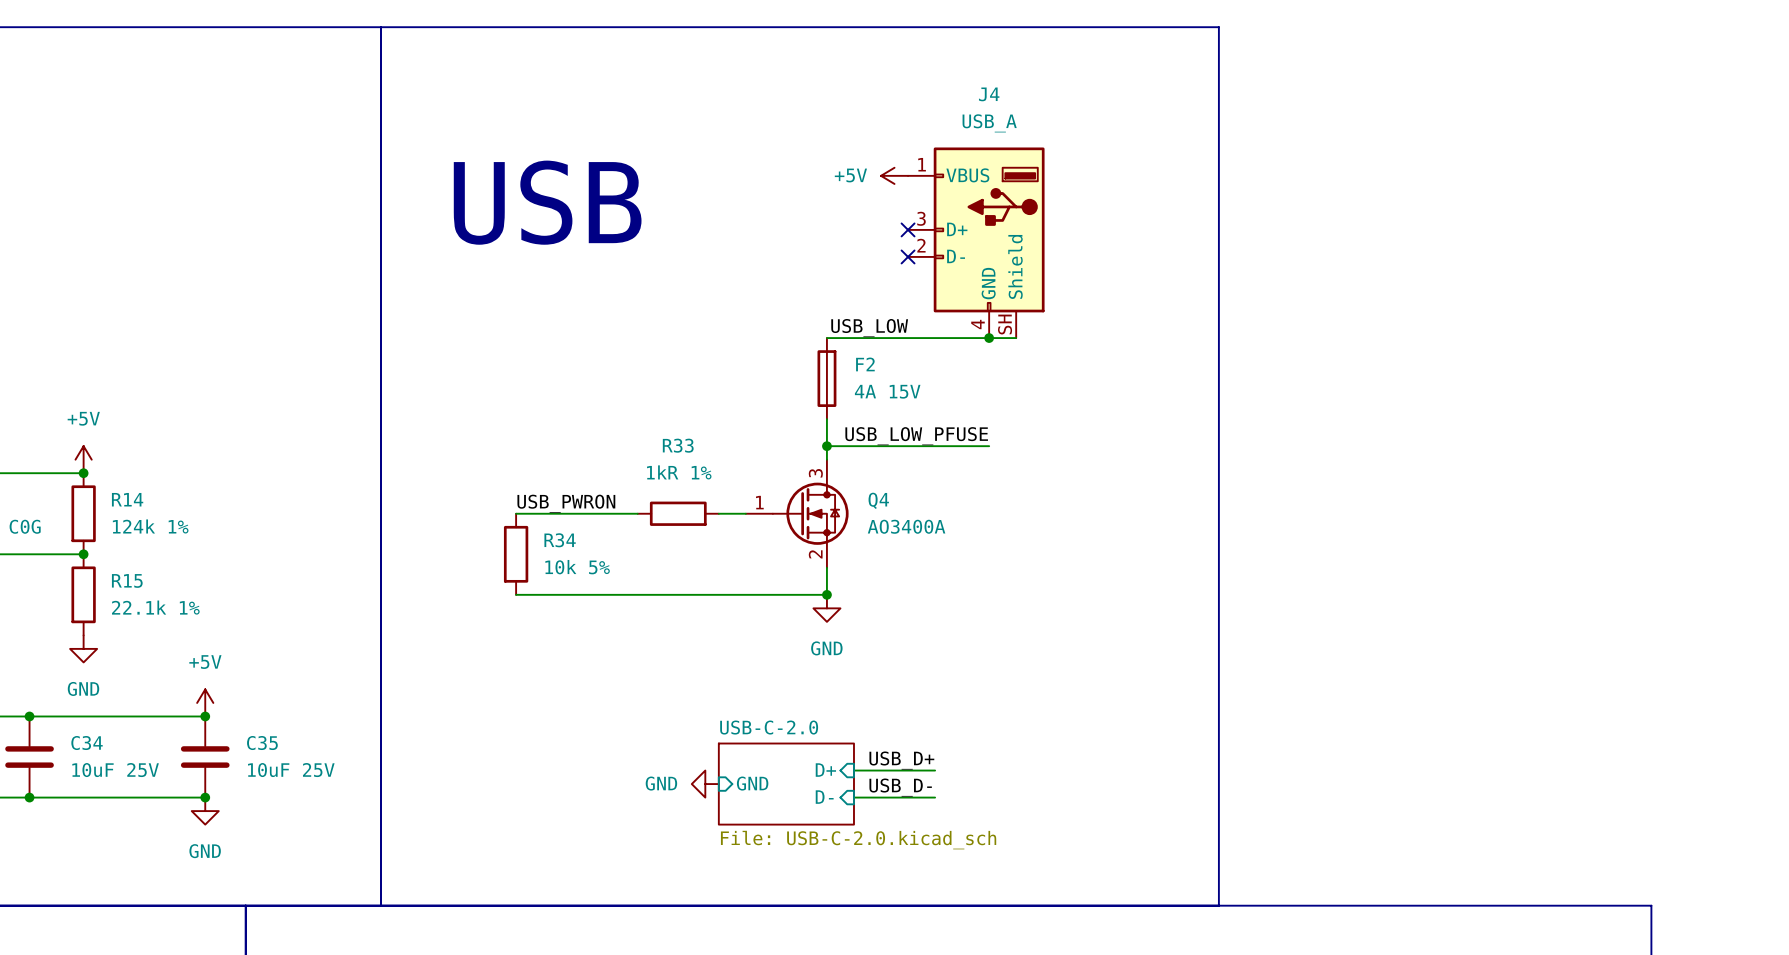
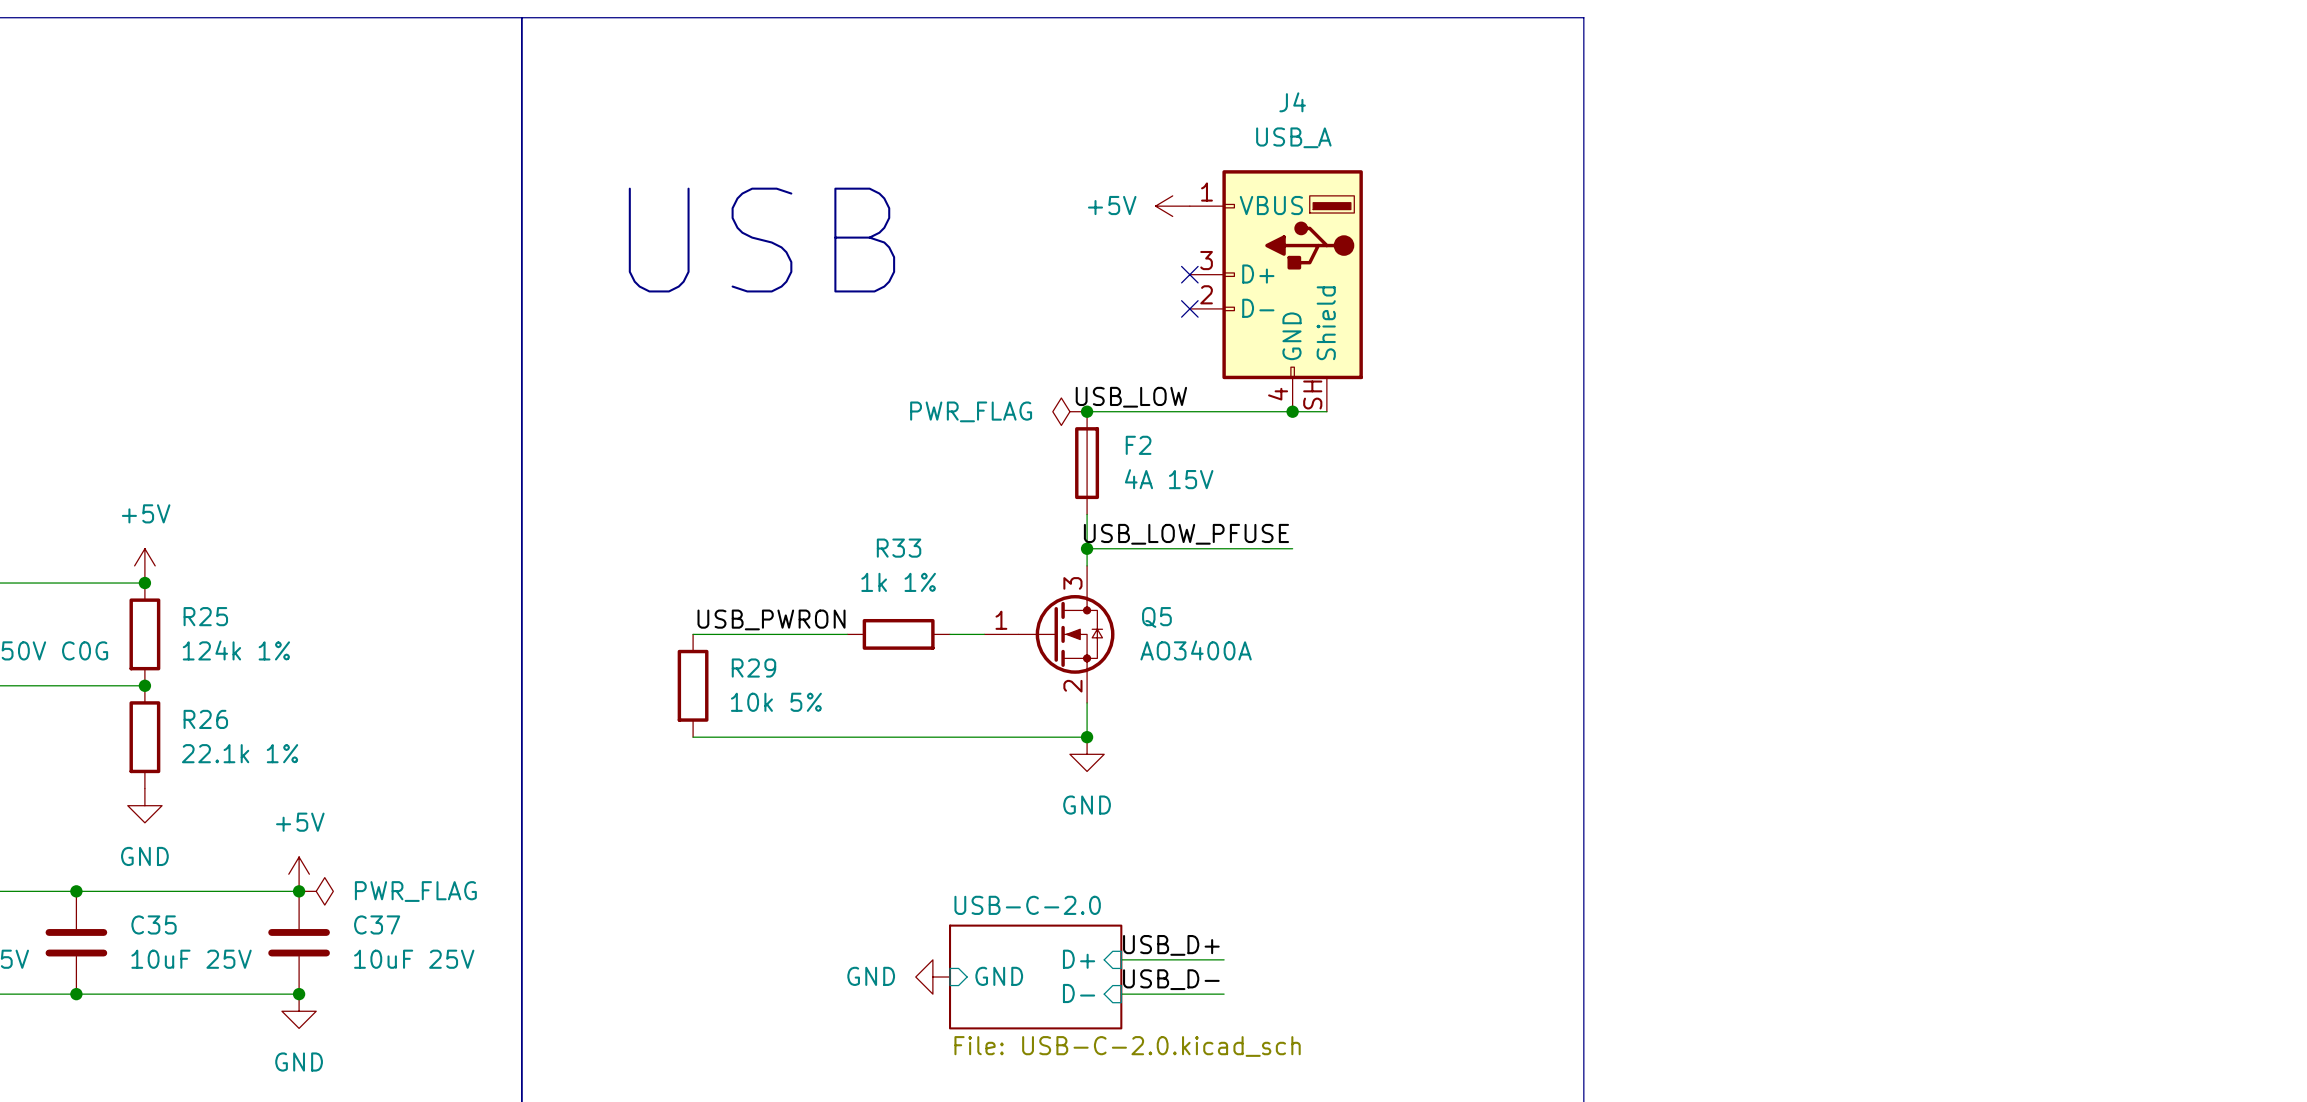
power symbol: none -> PWR_FLAG (1069, 411)
junction: none -> (1087, 411)
R33 value: 1kR 1% (679, 472) -> 1k 1% (898, 582)
R14 name: R14 (127, 499) -> R25 (205, 616)
Q4 name: Q4 (878, 500) -> Q5 (1156, 617)
R34 name: R34 (560, 540) -> R29 (753, 668)
R15 name: R15 (127, 580) -> R26 (205, 719)
power symbol: none -> PWR_FLAG (316, 891)
C34 name: C34 (87, 743) -> C35 (154, 924)
C35 name: C35 (262, 743) -> C37 (377, 924)

